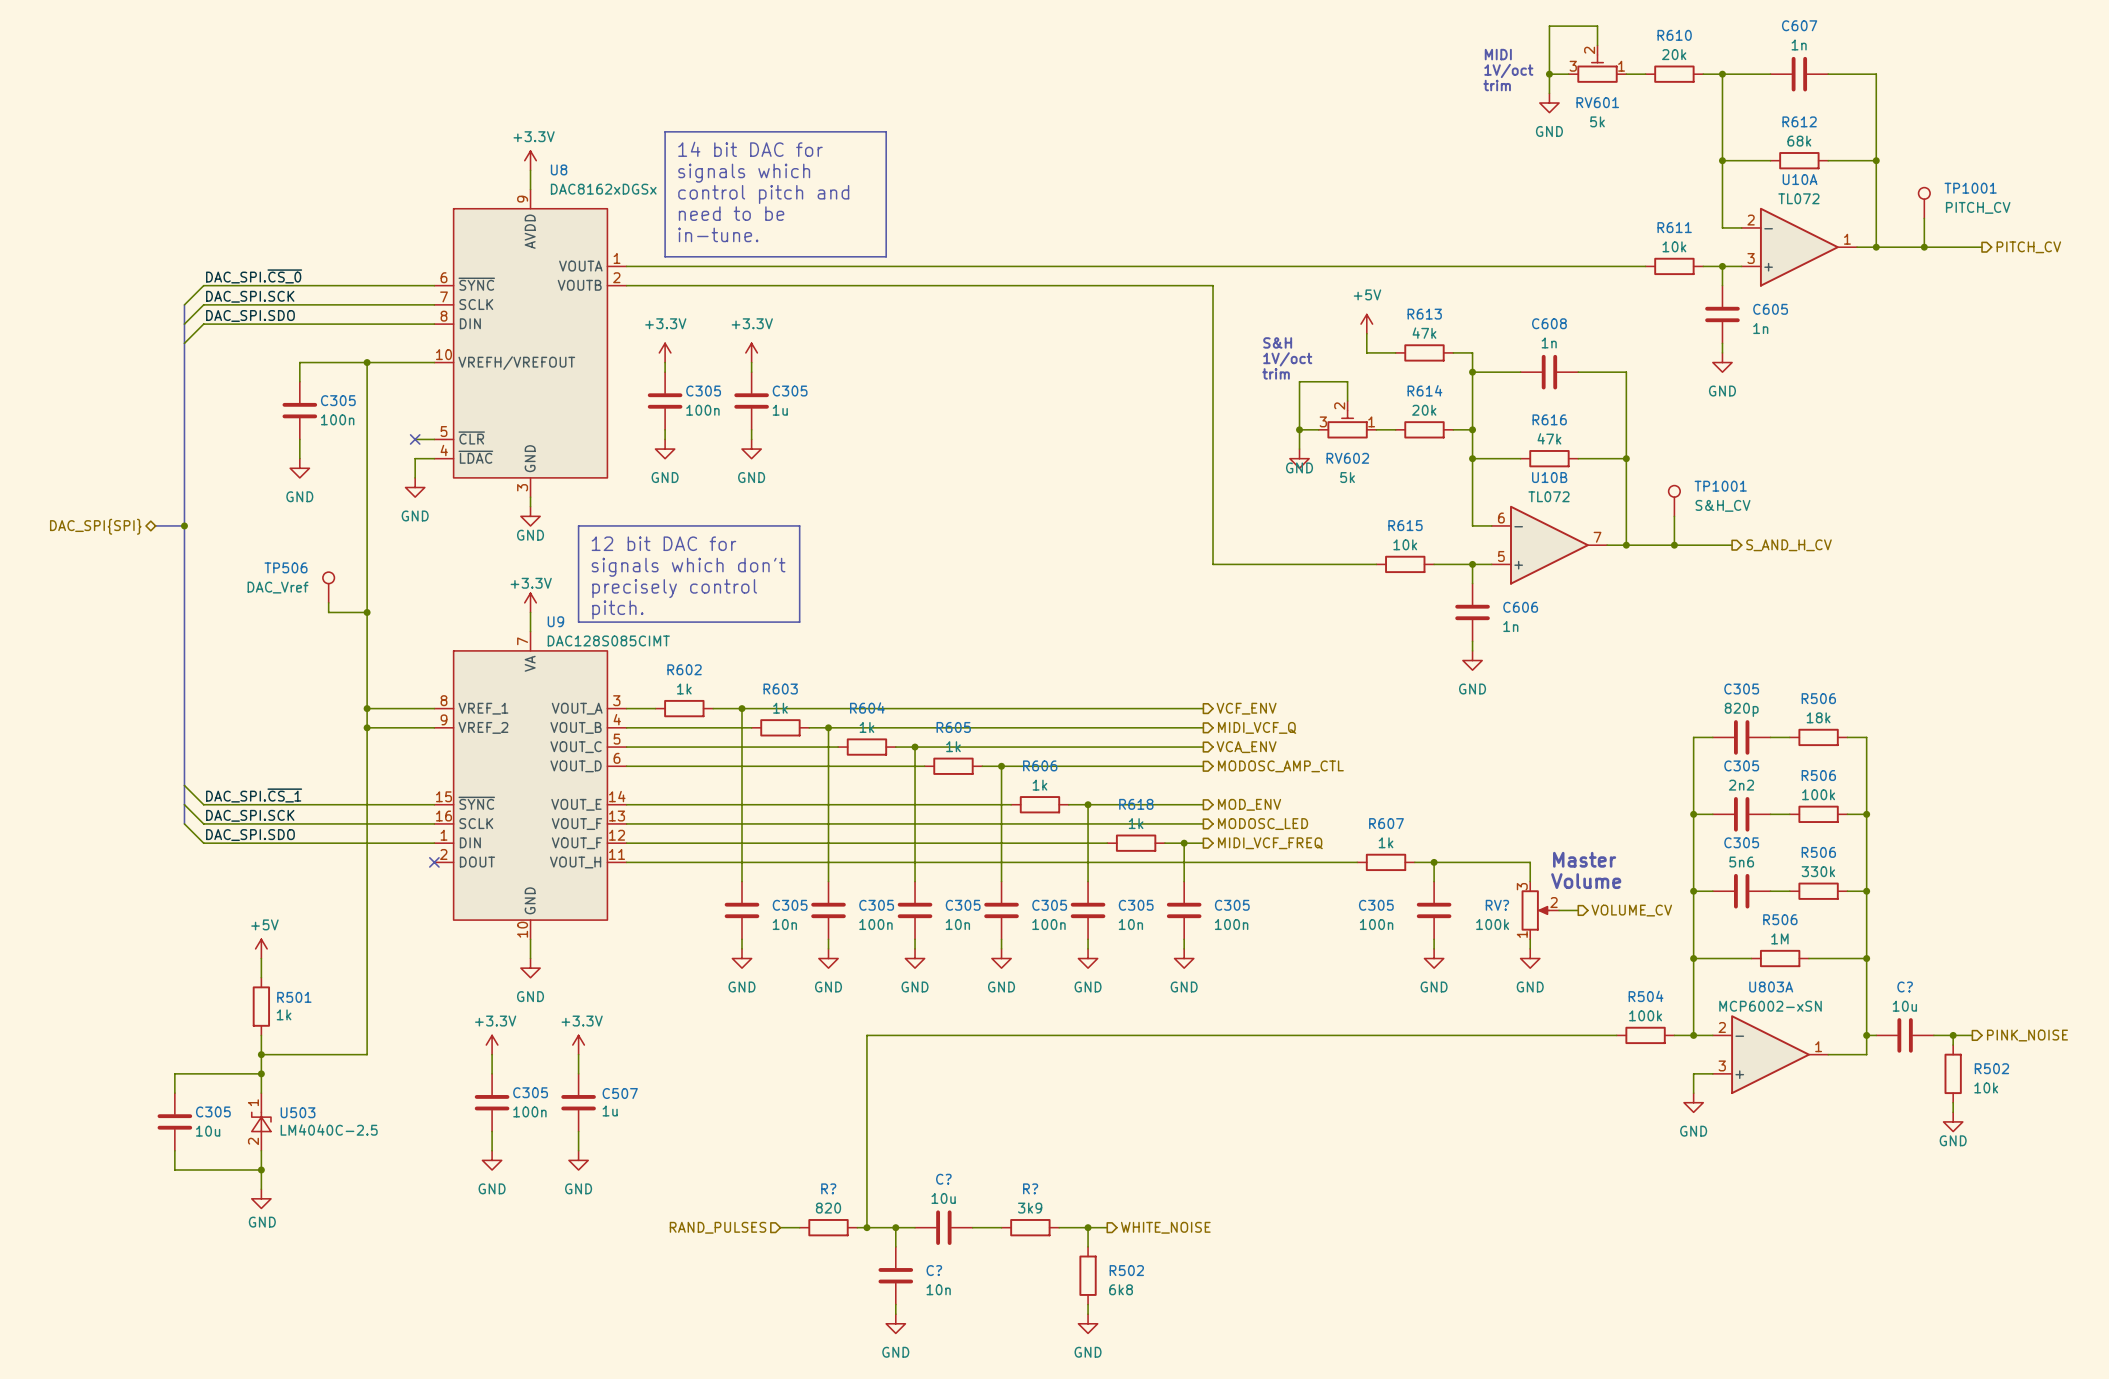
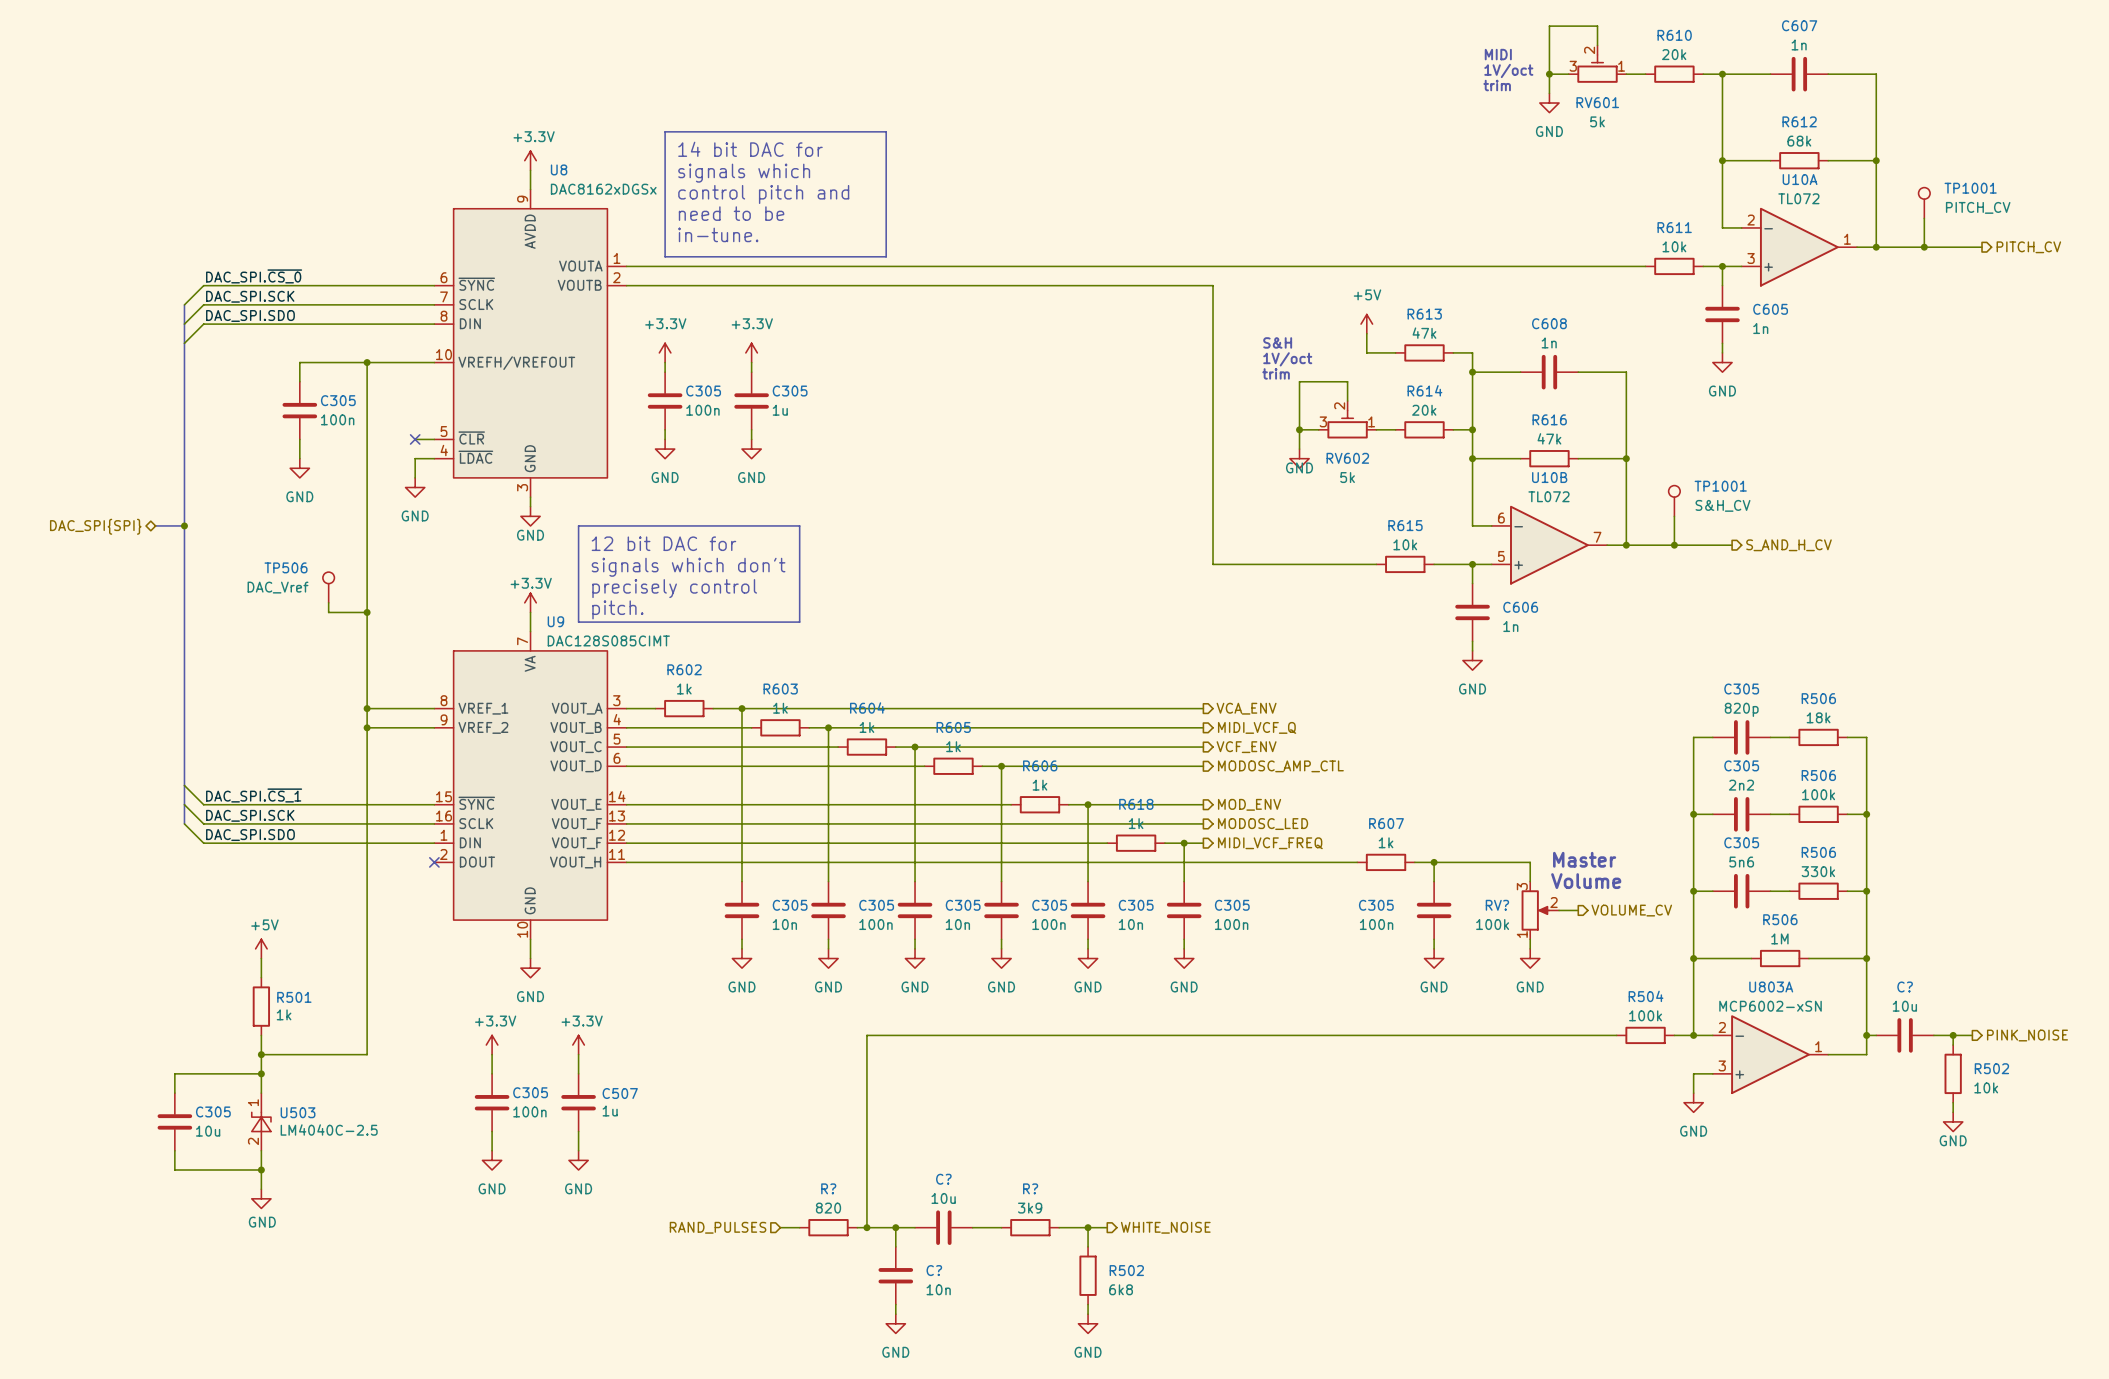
hierarchical label: VCF_ENV (1246, 708) -> VCA_ENV (1246, 708)
hierarchical label: VCA_ENV (1246, 747) -> VCF_ENV (1246, 747)

